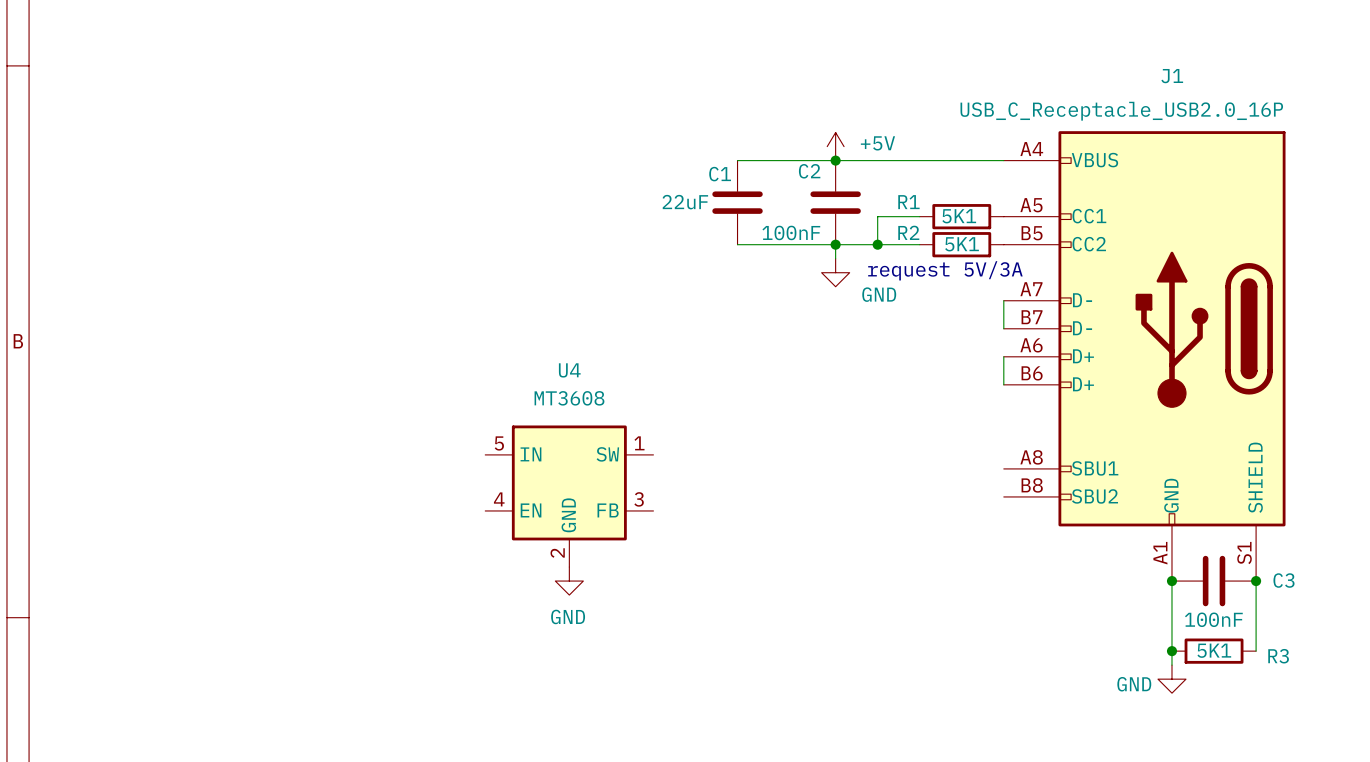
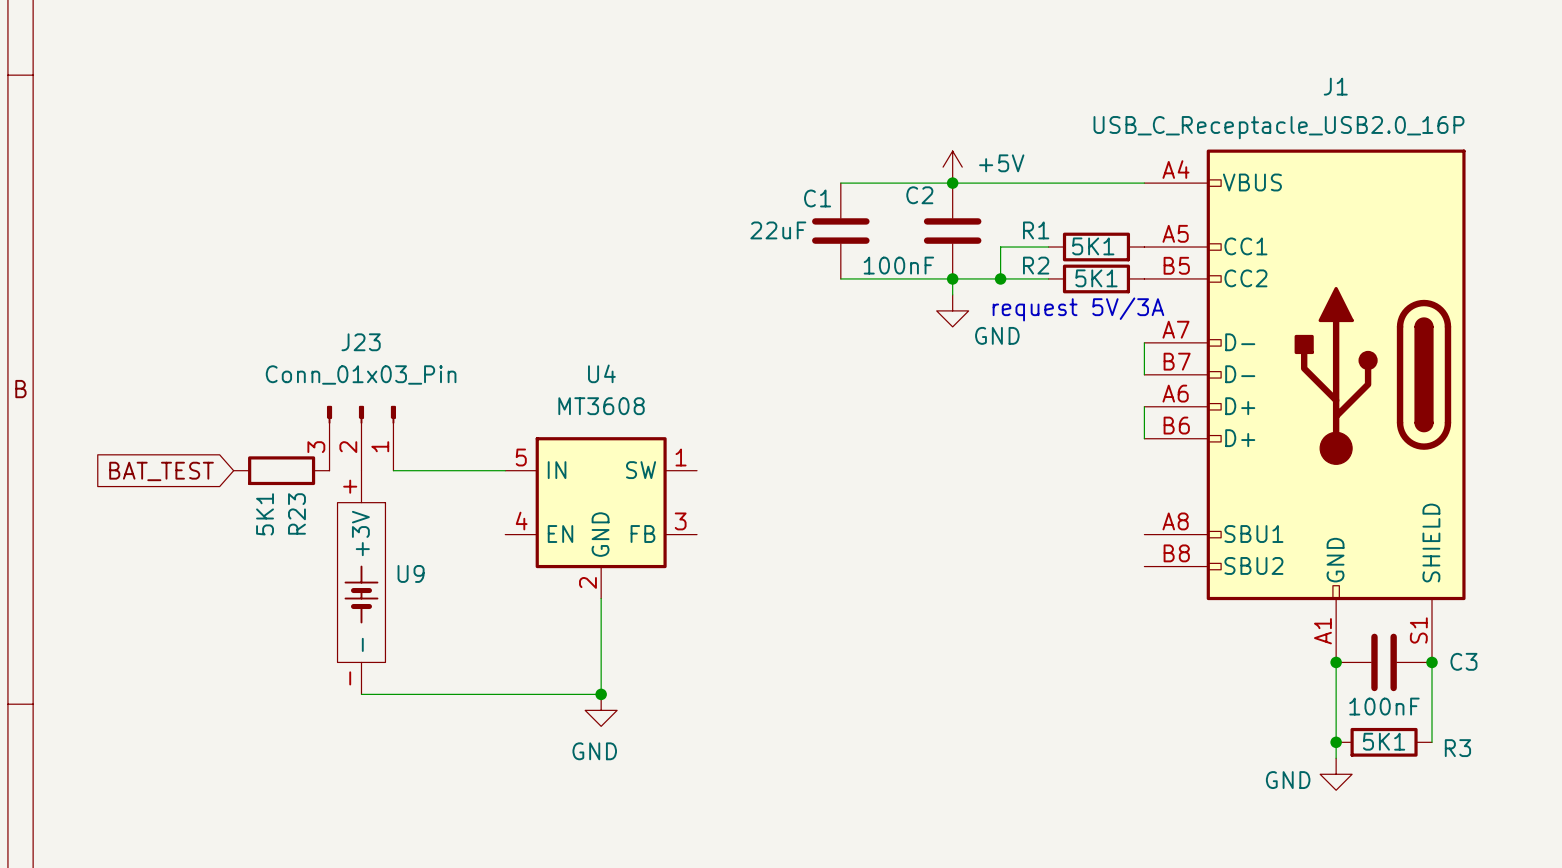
J23: none -> Conn_01x03_Pin (361, 438)
R23: none -> 5K1 (281, 470)
wire: none -> (393, 470) (505, 470)
global label: none -> BAT_TEST (161, 471)
U4 position: (569, 496) -> (601, 517)
U9: none -> (361, 582)
wire: none -> (601, 598) (601, 694) (361, 694)
power symbol position: GND (569, 581) -> GND (601, 710)
junction: none -> (601, 694)

